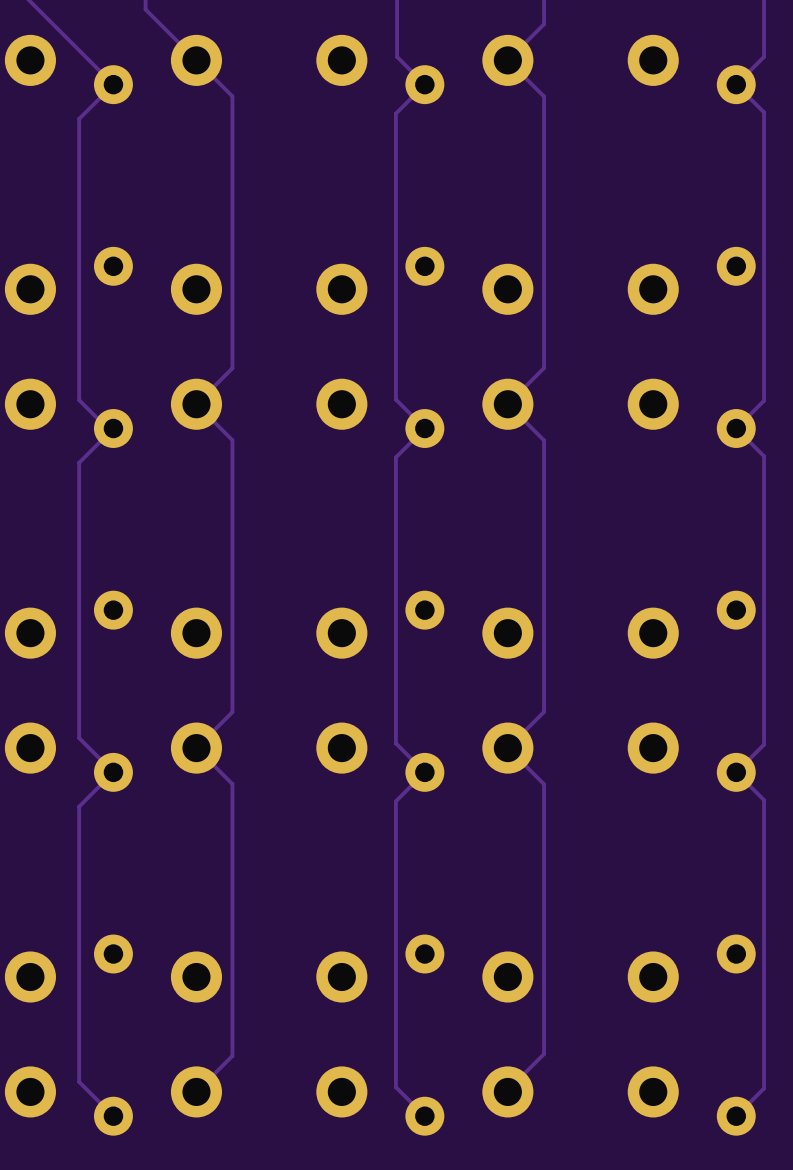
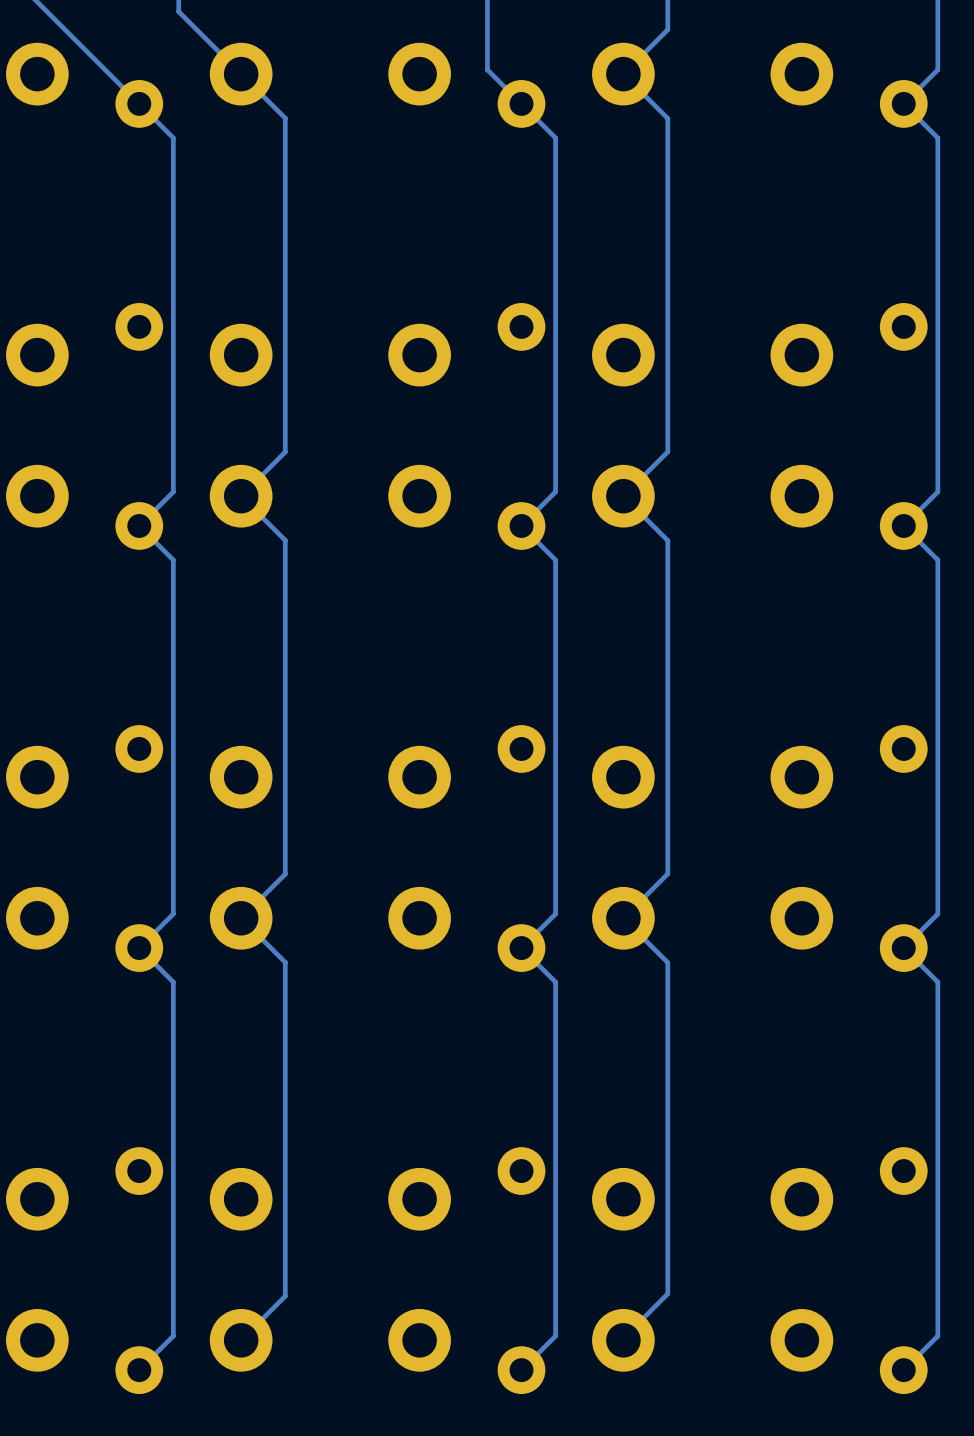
track: (113, 84) (79, 118) (79, 400) (107, 428) -> none
track: (424, 84) (395, 113) (395, 399) (424, 428) (395, 457) (395, 743) (424, 772) (395, 801) (395, 1087) (424, 1116) -> (521, 103) (555, 137) (555, 491) (521, 525) (555, 560) (555, 913) (521, 948) (555, 982) (555, 1336) (521, 1370)
track: (113, 428) (79, 462) (79, 738) (113, 772) (79, 806) (79, 1081) (113, 1116) -> (139, 103) (173, 137) (173, 491) (139, 525) (173, 560) (173, 913) (139, 948) (173, 982) (173, 1336) (139, 1370)

